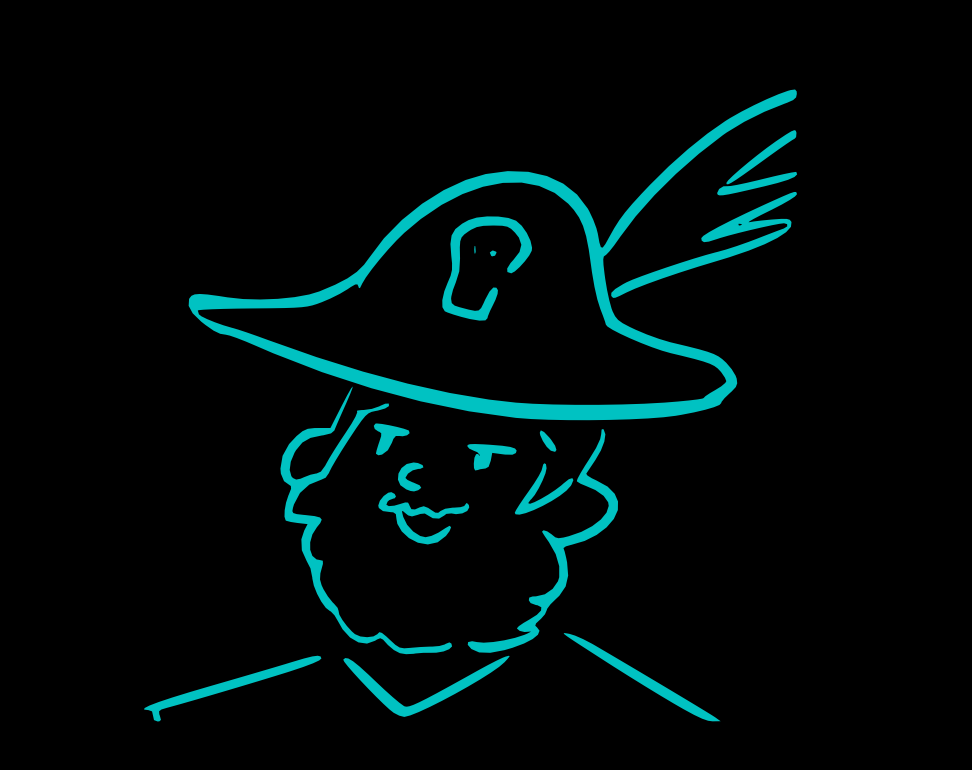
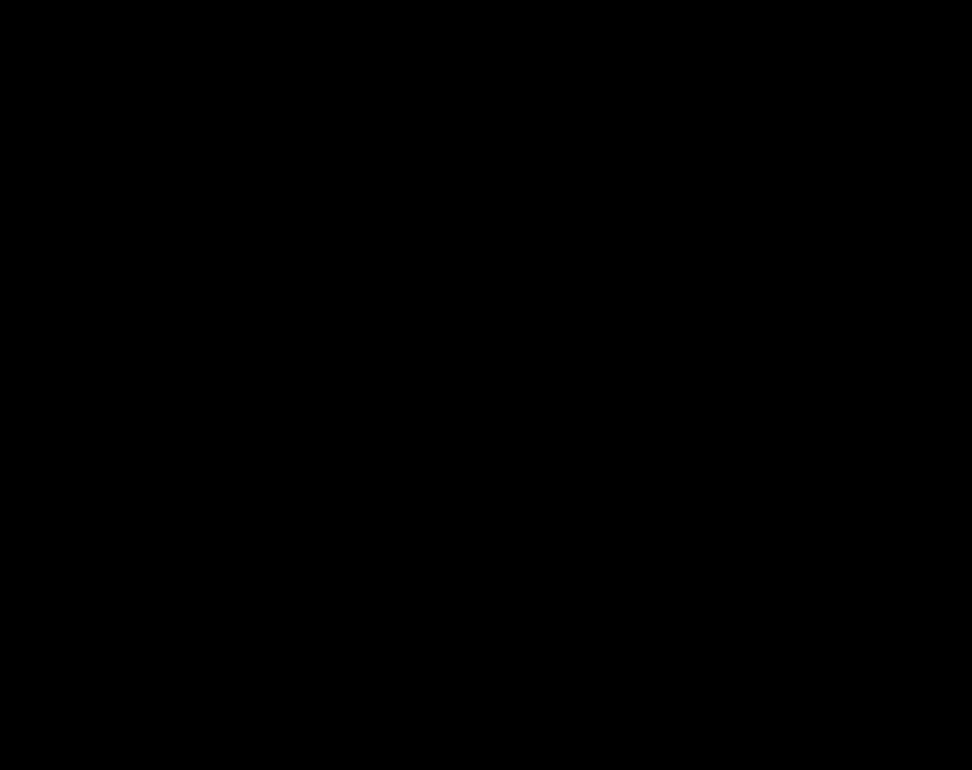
drawing: [144, 89, 798, 722] -> none

